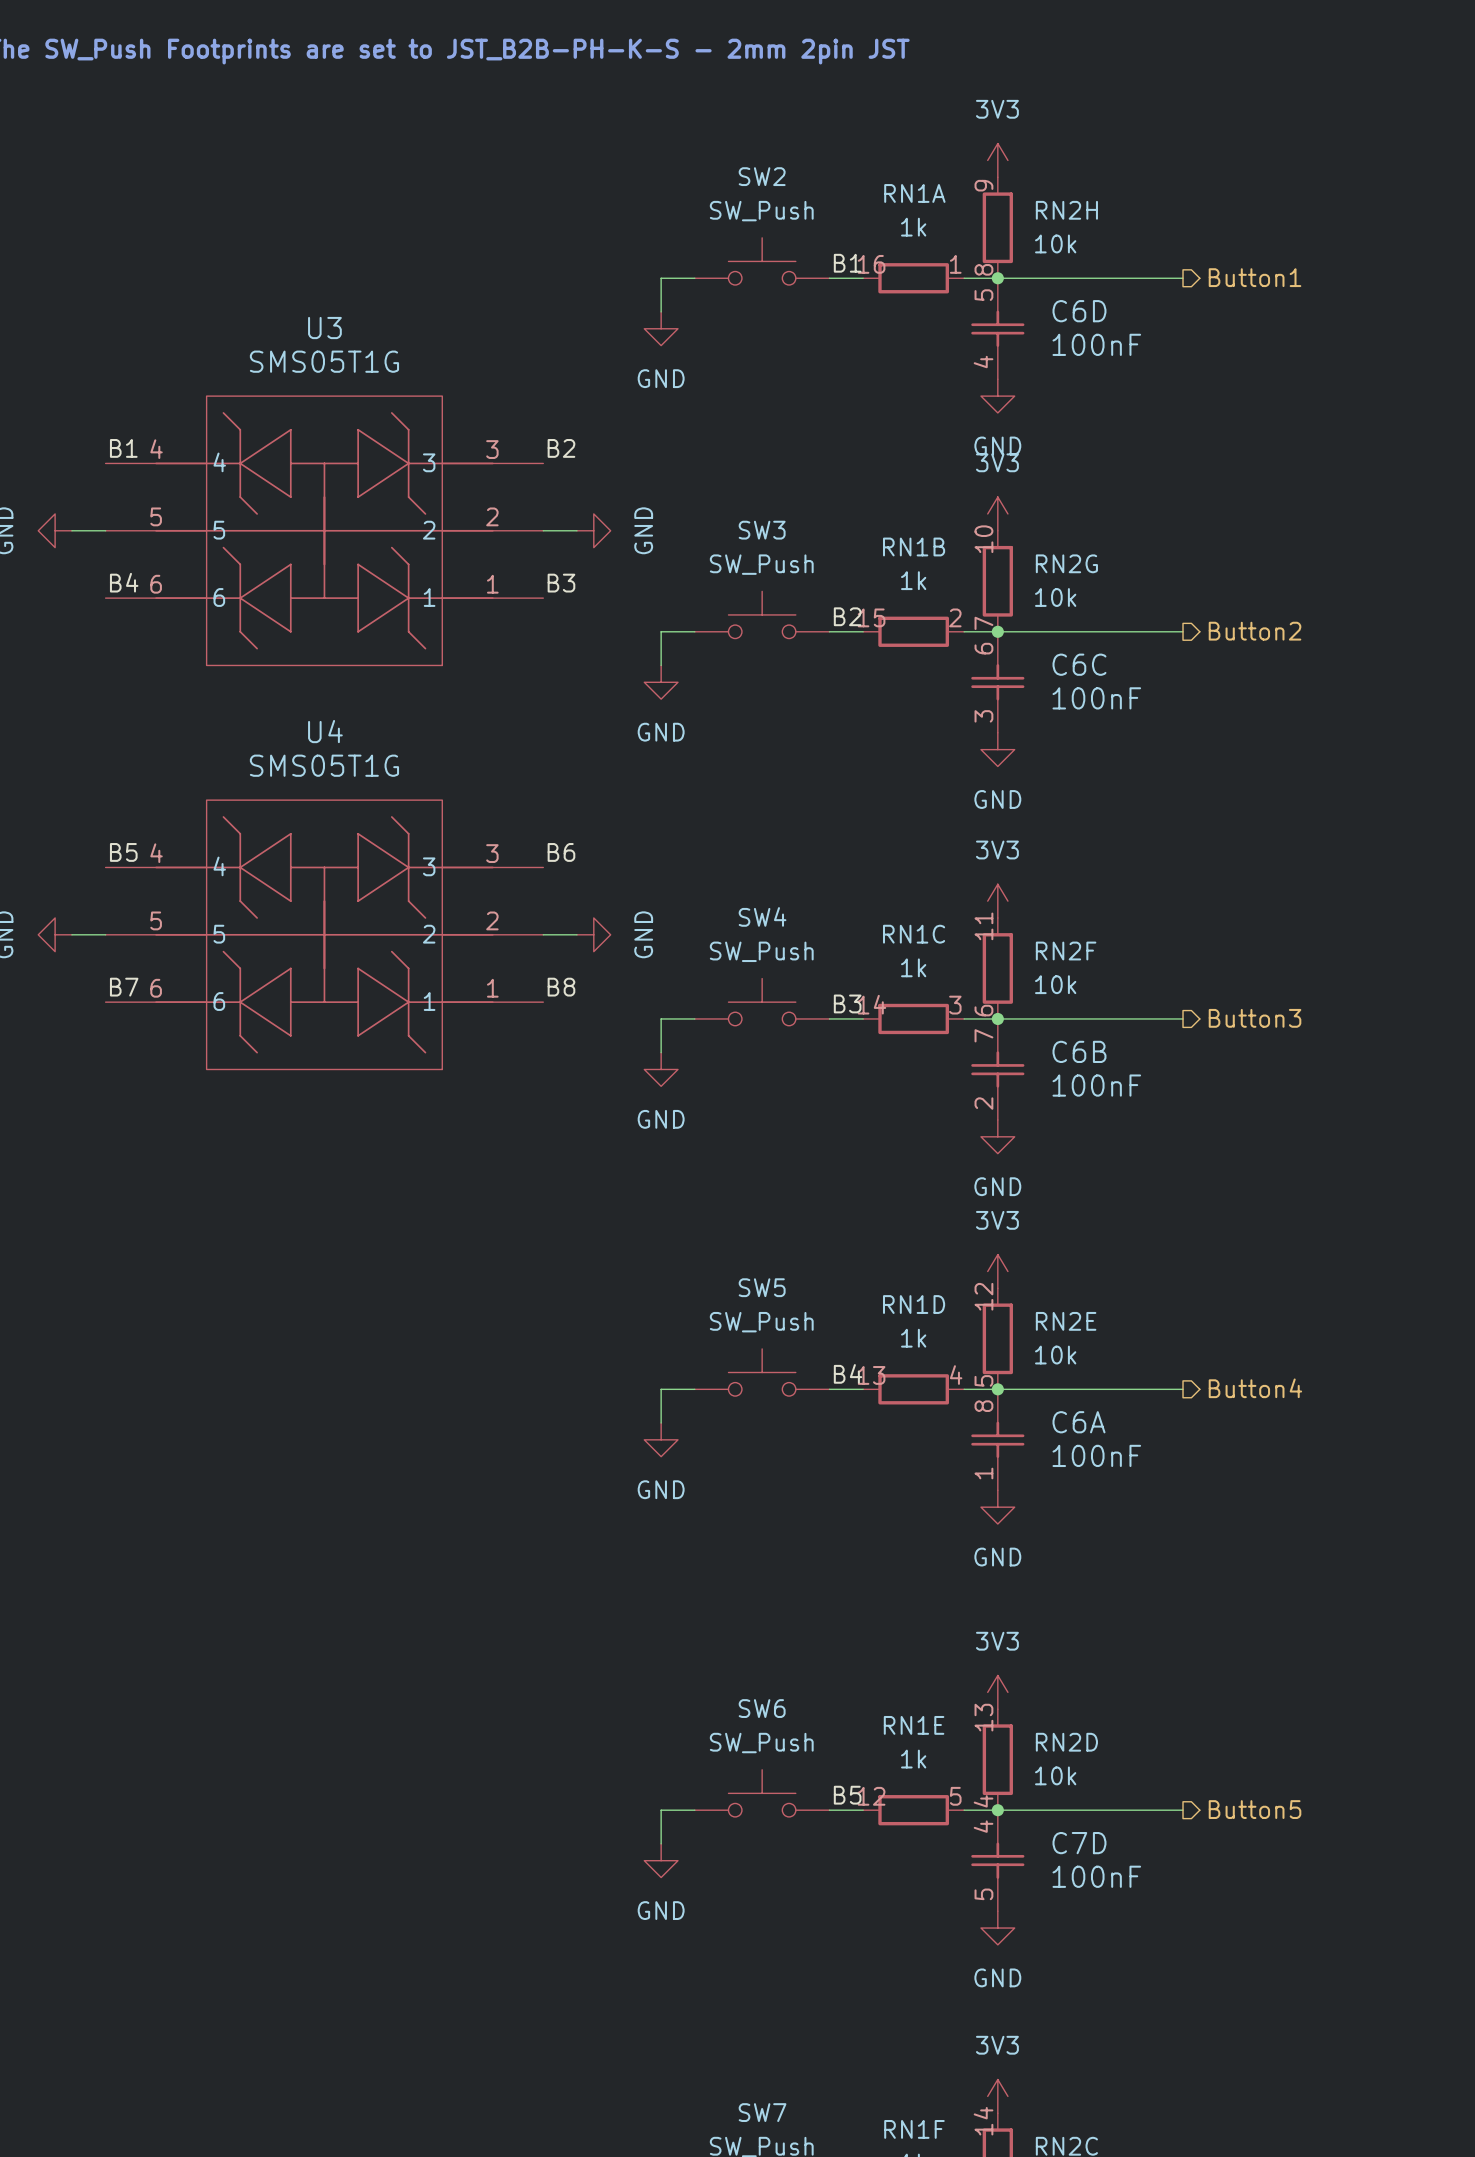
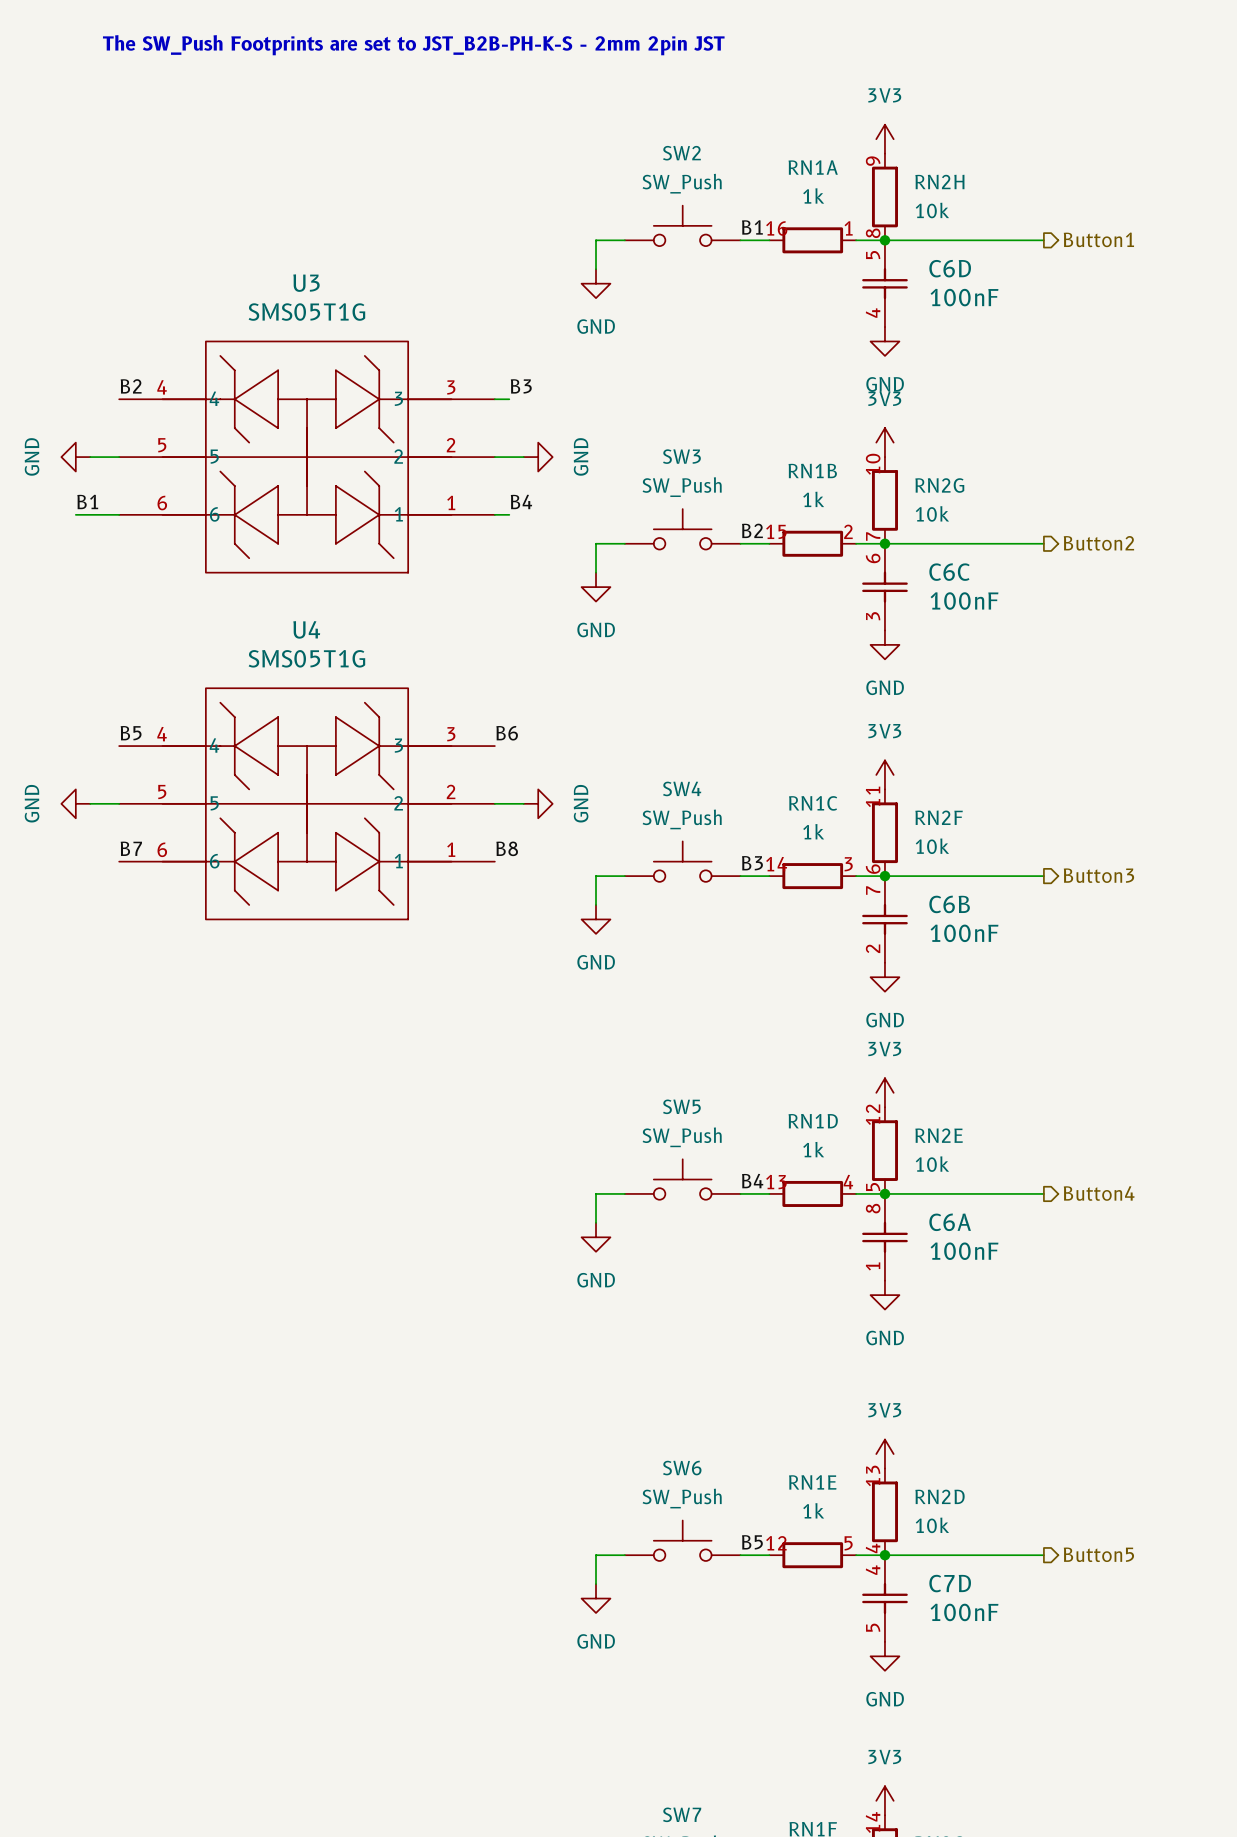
label: B1 (123, 448) -> B2 (131, 386)
label: B2 (561, 448) -> none
wire: none -> (494, 399) (509, 399)
label: B4 (124, 582) -> none
label: none -> B4 (521, 501)
label: none -> B1 (87, 501)
label position: B3 (561, 583) -> B3 (521, 386)
wire: none -> (75, 514) (119, 514)
wire: none -> (494, 514) (509, 514)

